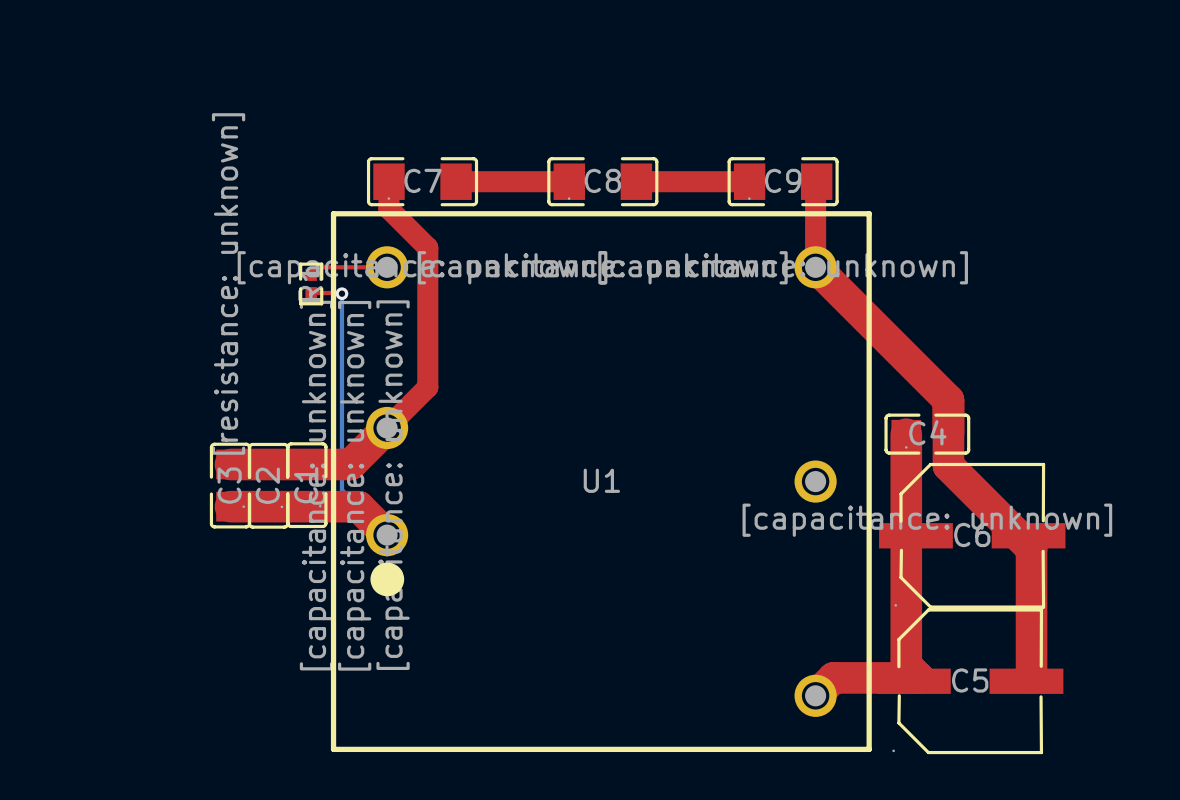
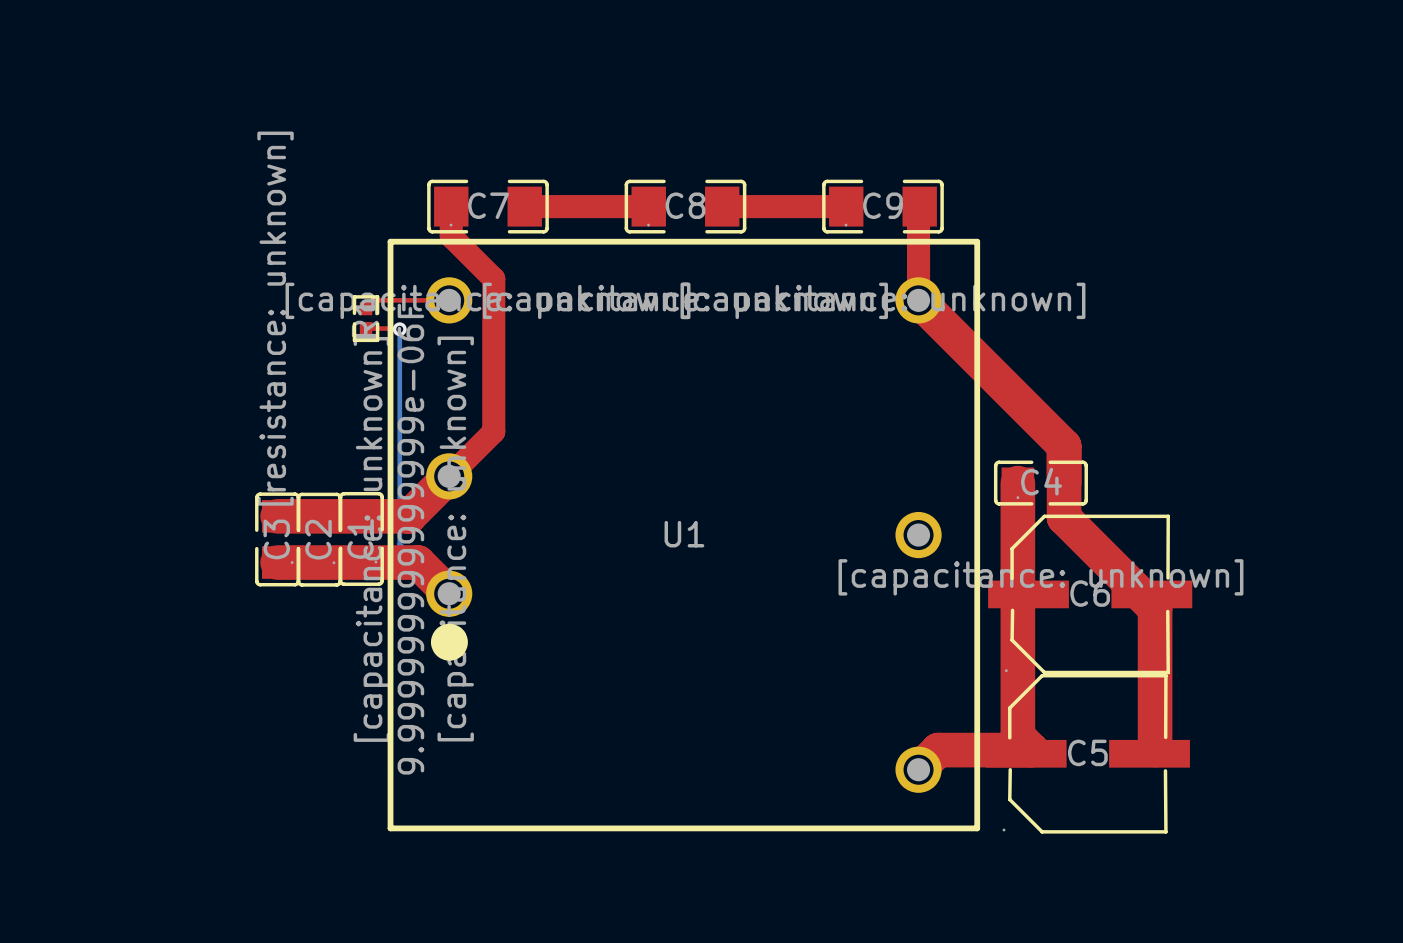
C2 value: [capacitance: unknown] (354, 485) -> 9.999999999999999e-06F (410, 539)

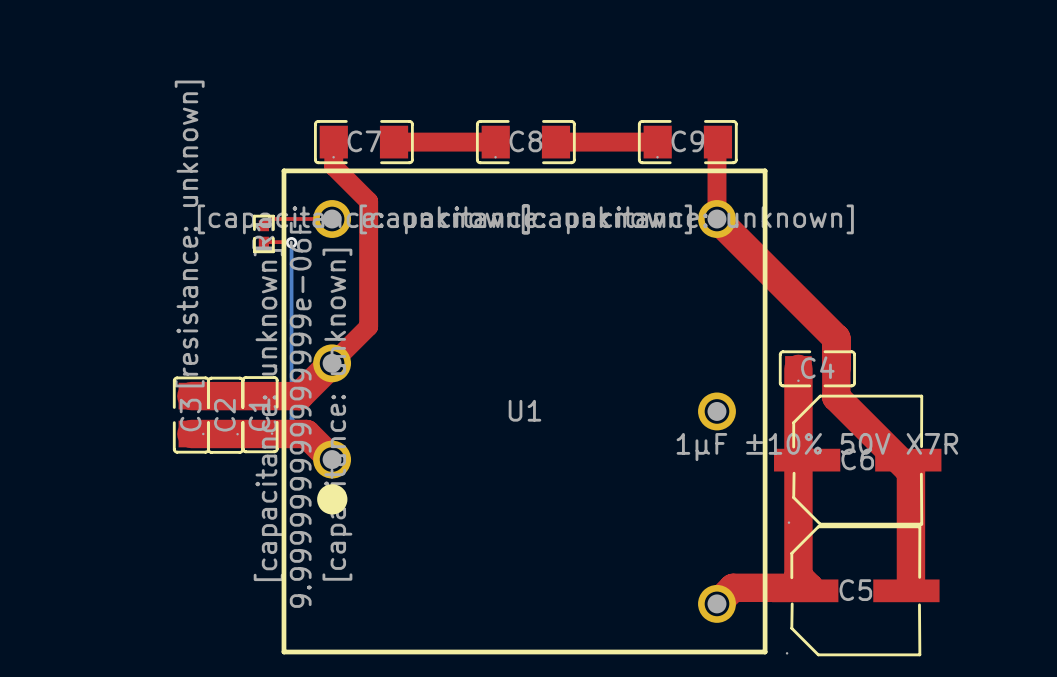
C4 value: [capacitance: unknown] (1040, 577) -> 1µF ±10% 50V X7R (817, 447)

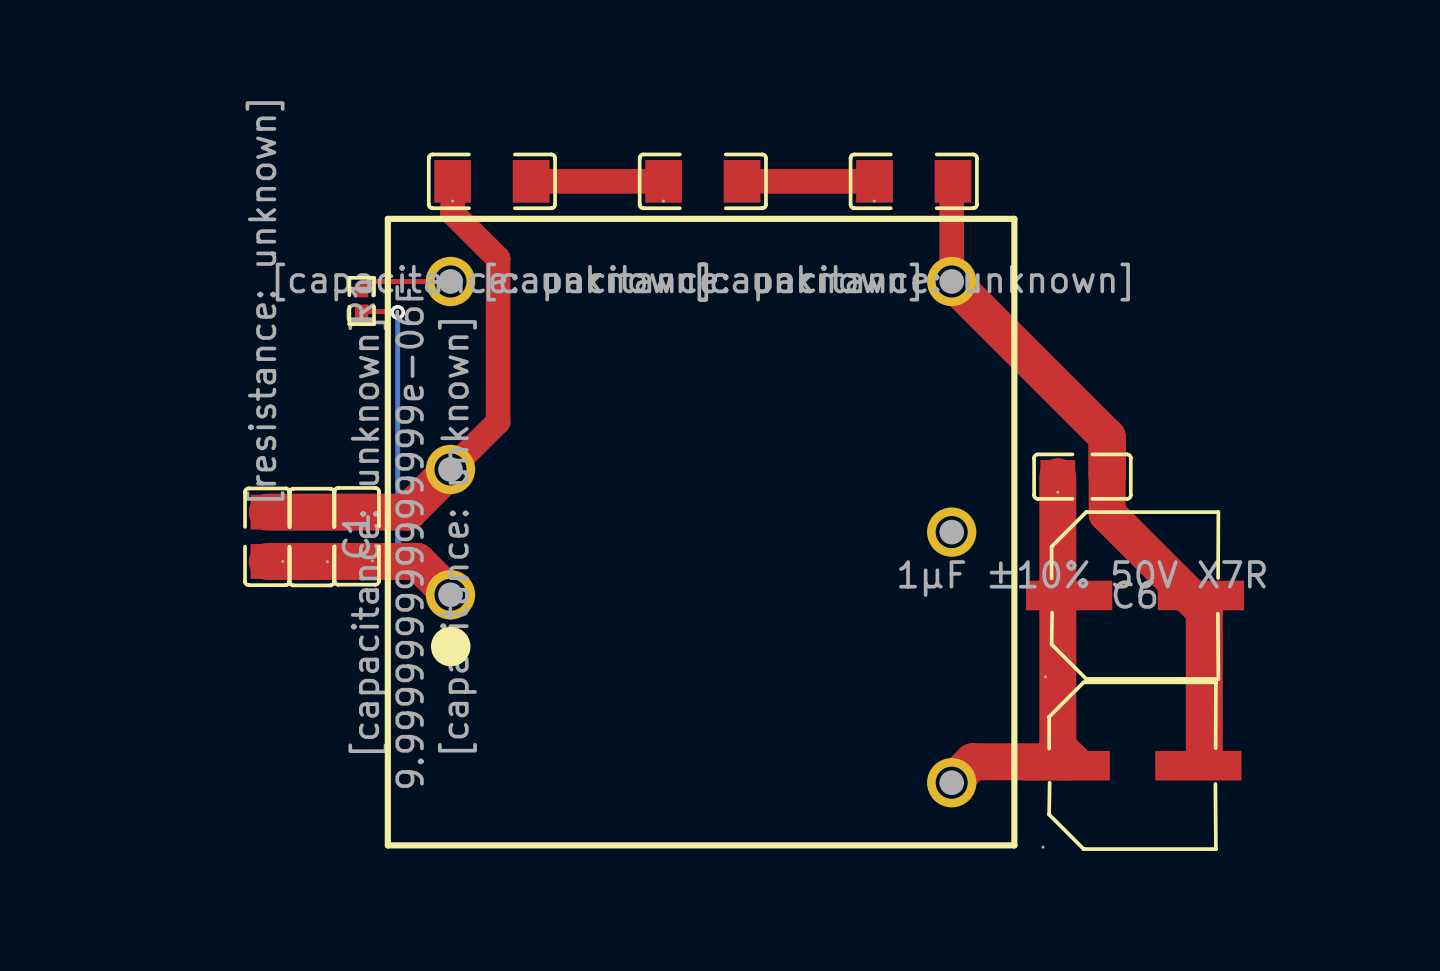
C7 name: C7 (364, 141) -> none
C8 name: C8 (525, 141) -> none
C9 name: C9 (687, 141) -> none
C4 name: C4 (817, 367) -> none
U1 name: U1 (524, 410) -> none
C3 name: C3 (190, 415) -> none
C2 name: C2 (224, 415) -> none
C5 name: C5 (855, 590) -> none

